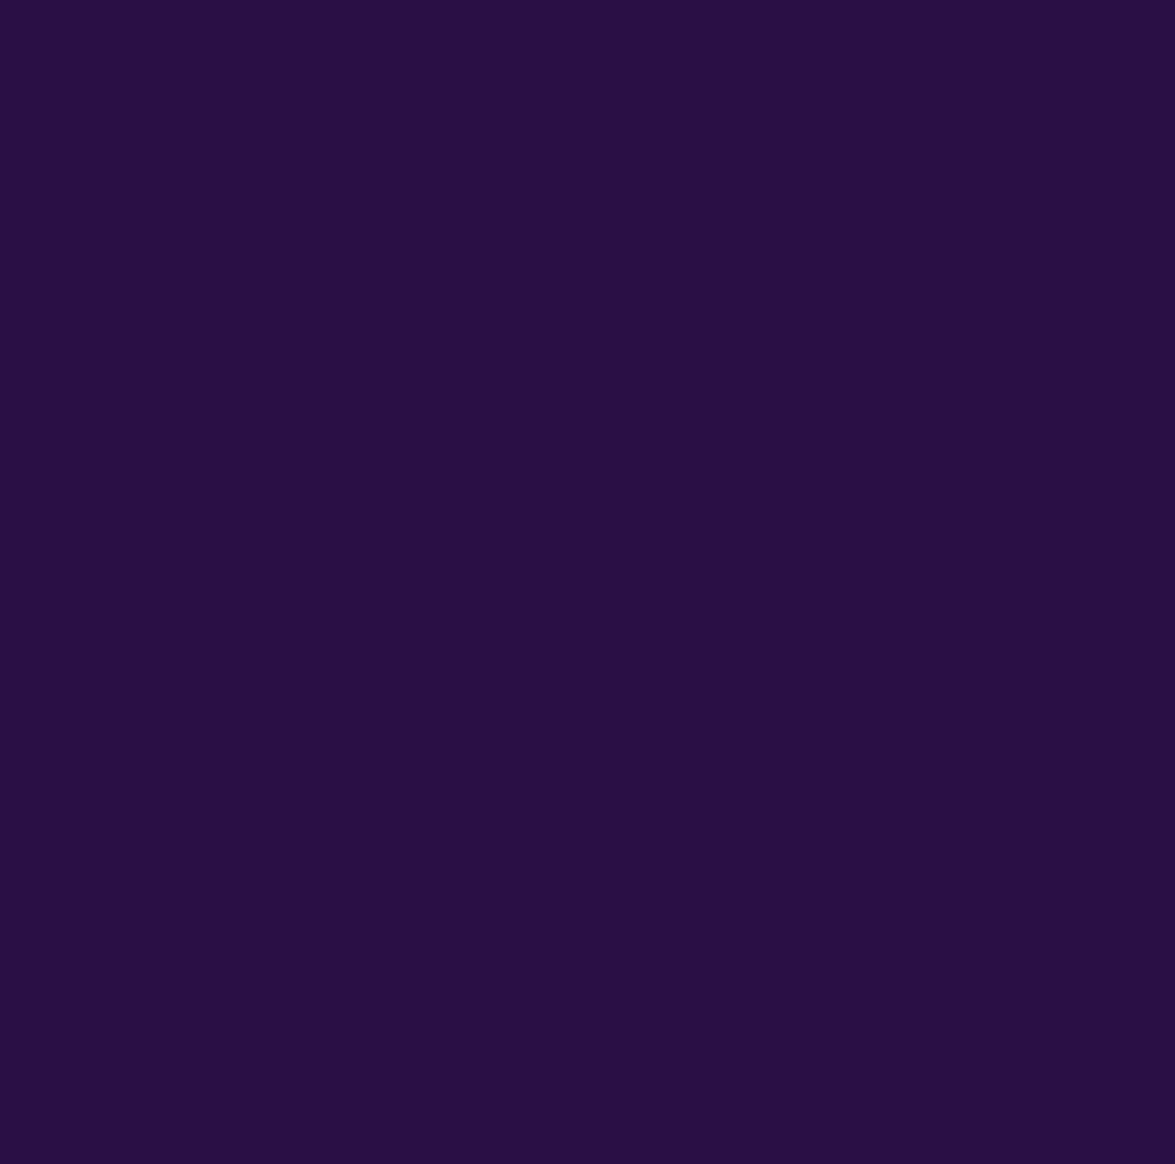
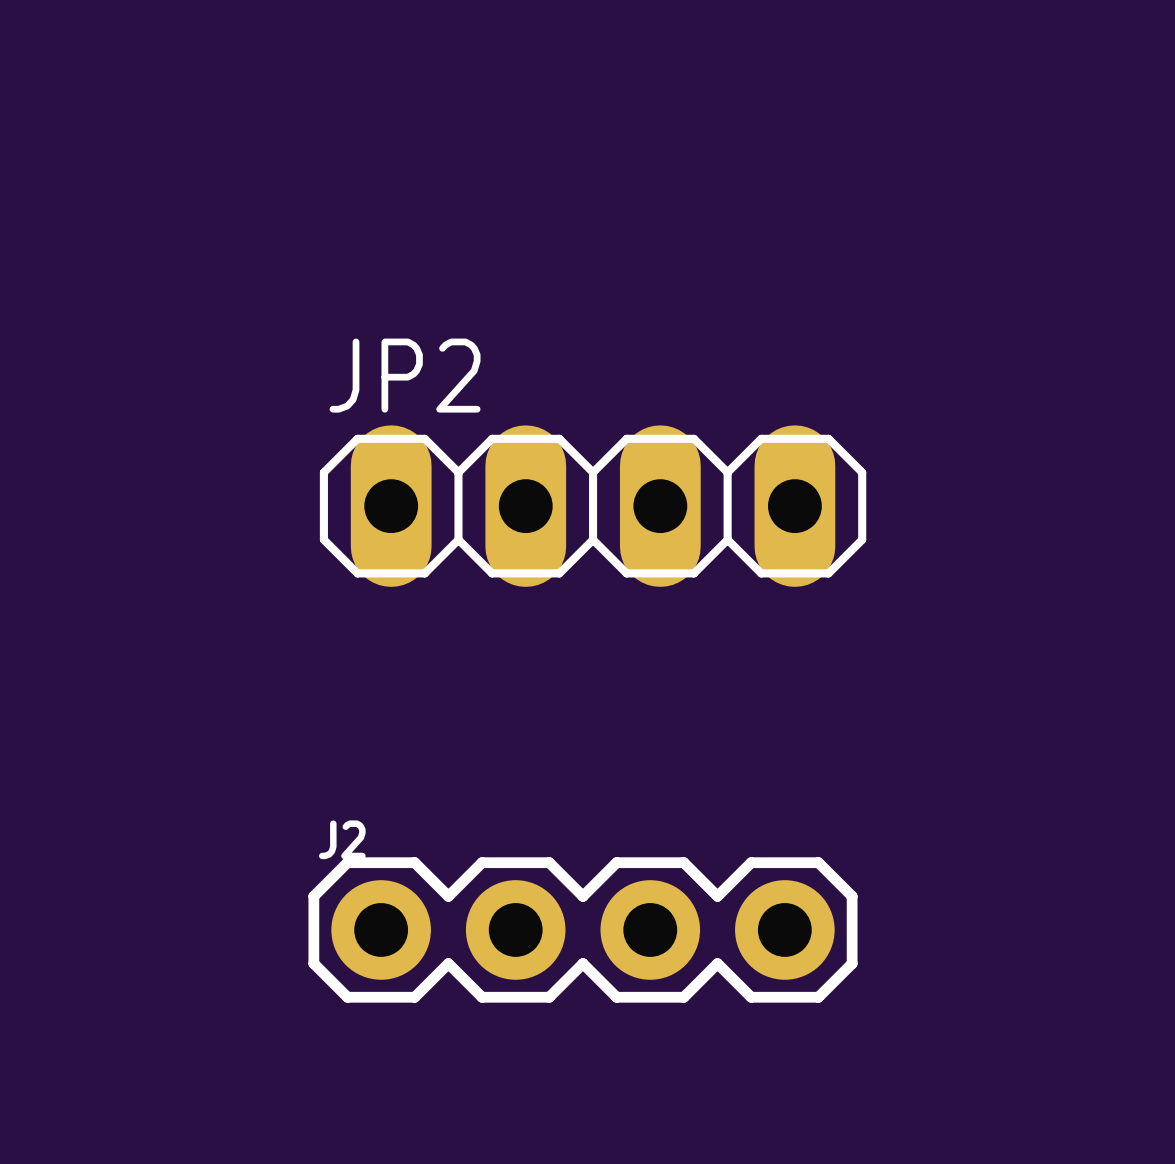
JP2: none -> (593, 506)
J2: none -> (582, 929)

